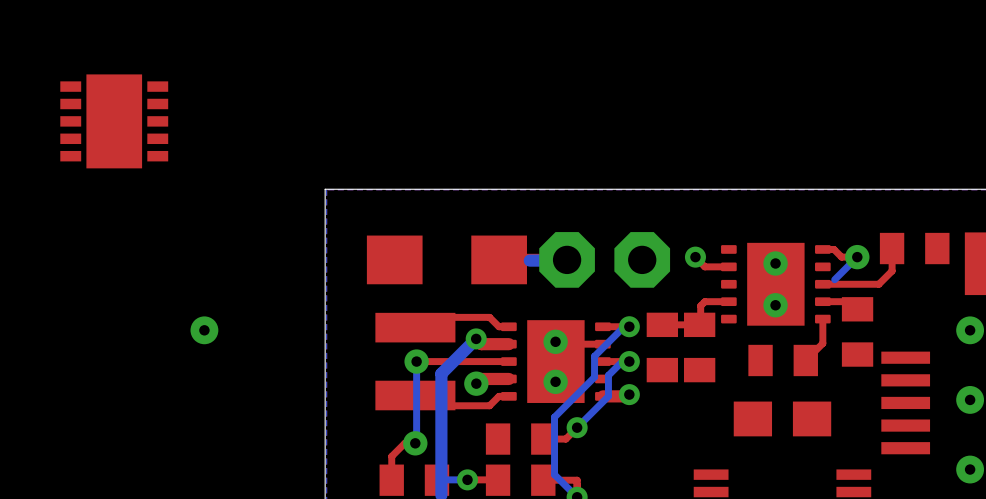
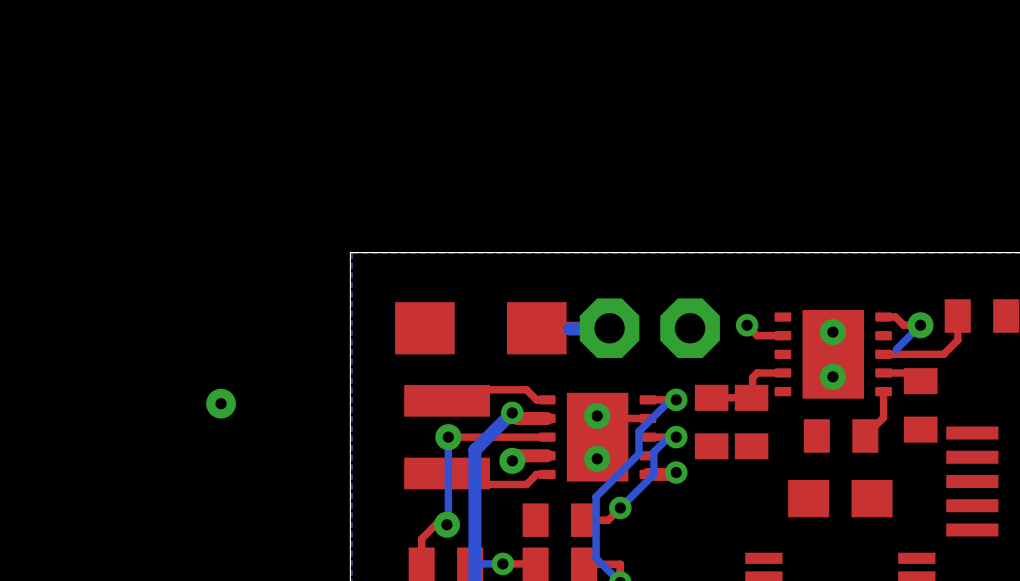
part: (114, 121) -> none

